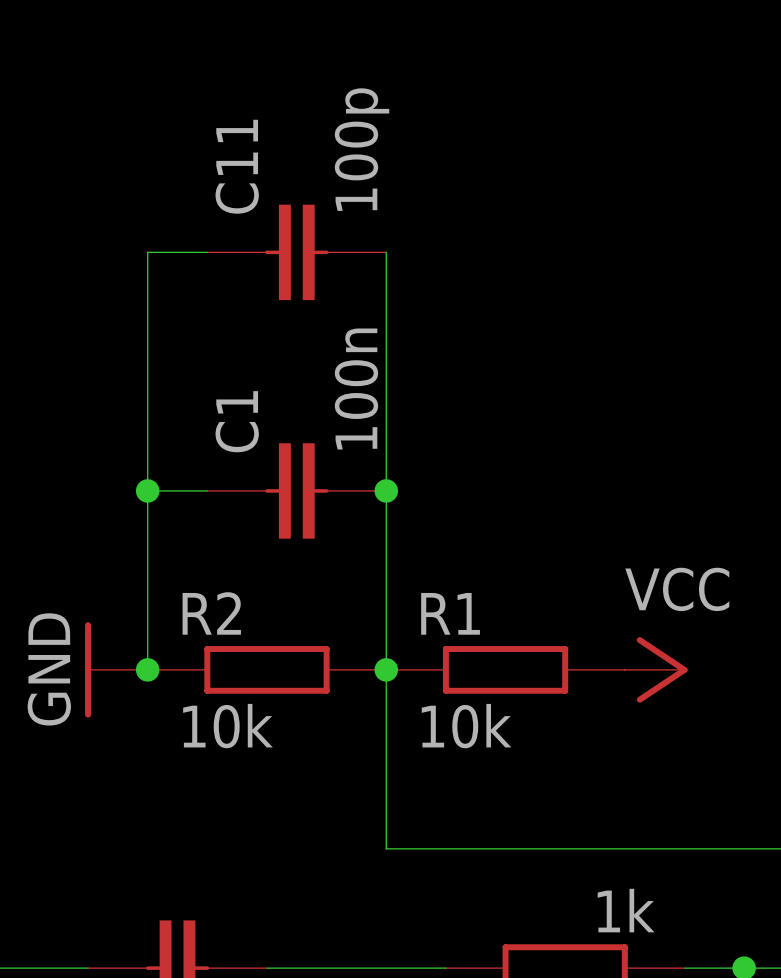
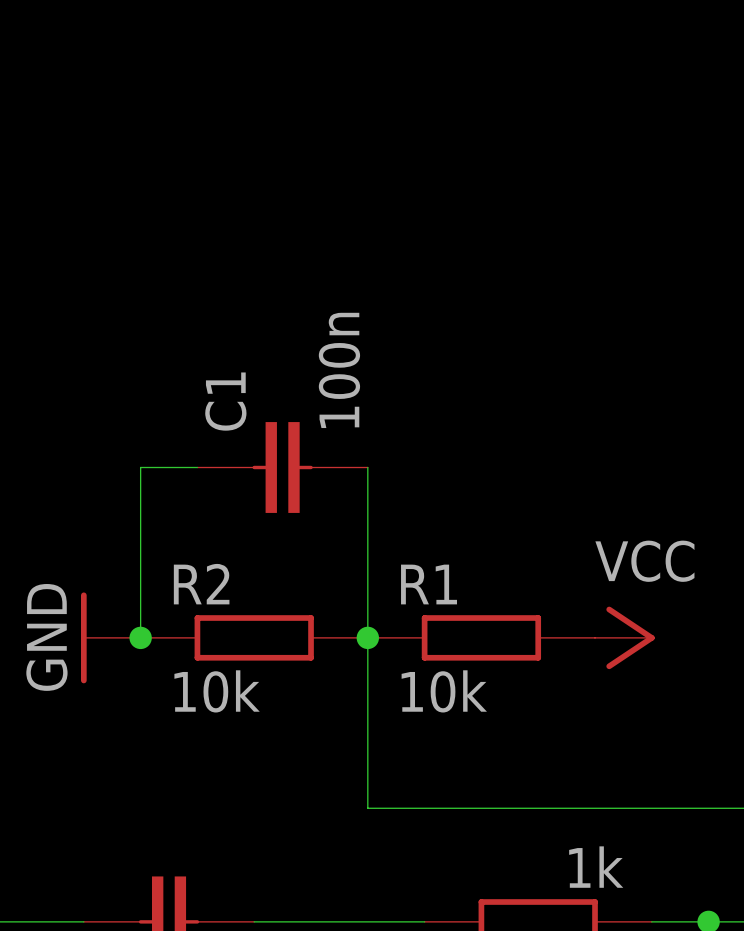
wire: (207, 252) (147, 252) (147, 490) -> none
C11: 100p (296, 252) -> none
wire: (386, 252) (386, 490) -> none
junction: (147, 490) -> none
junction: (386, 490) -> none

